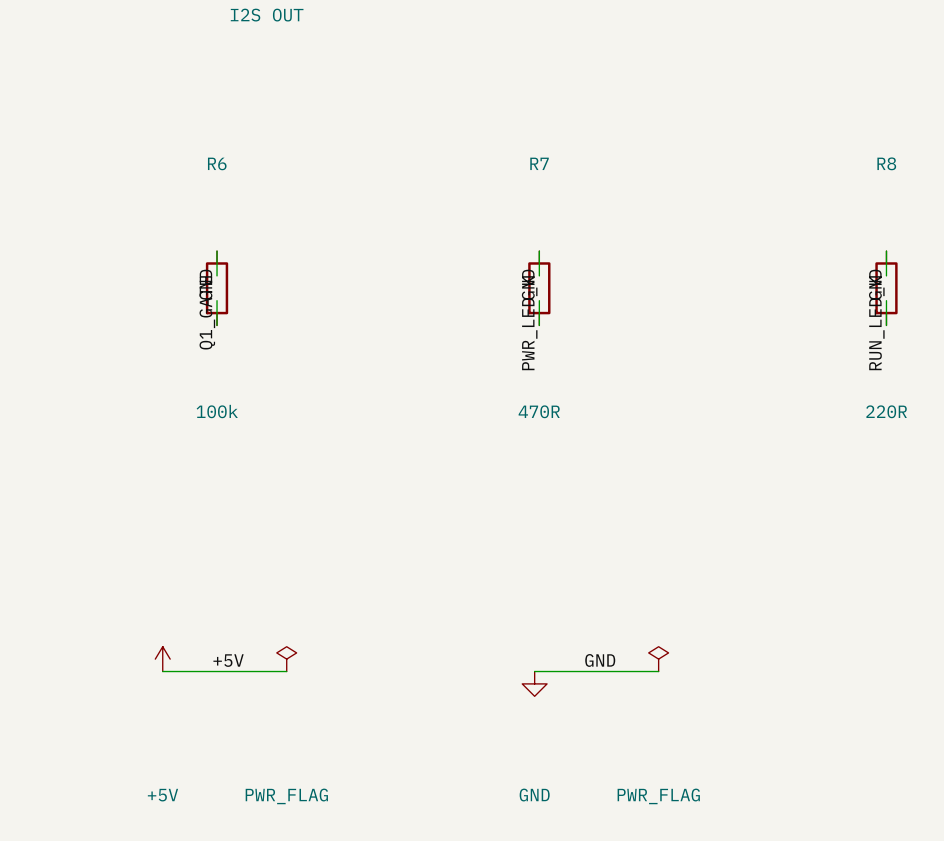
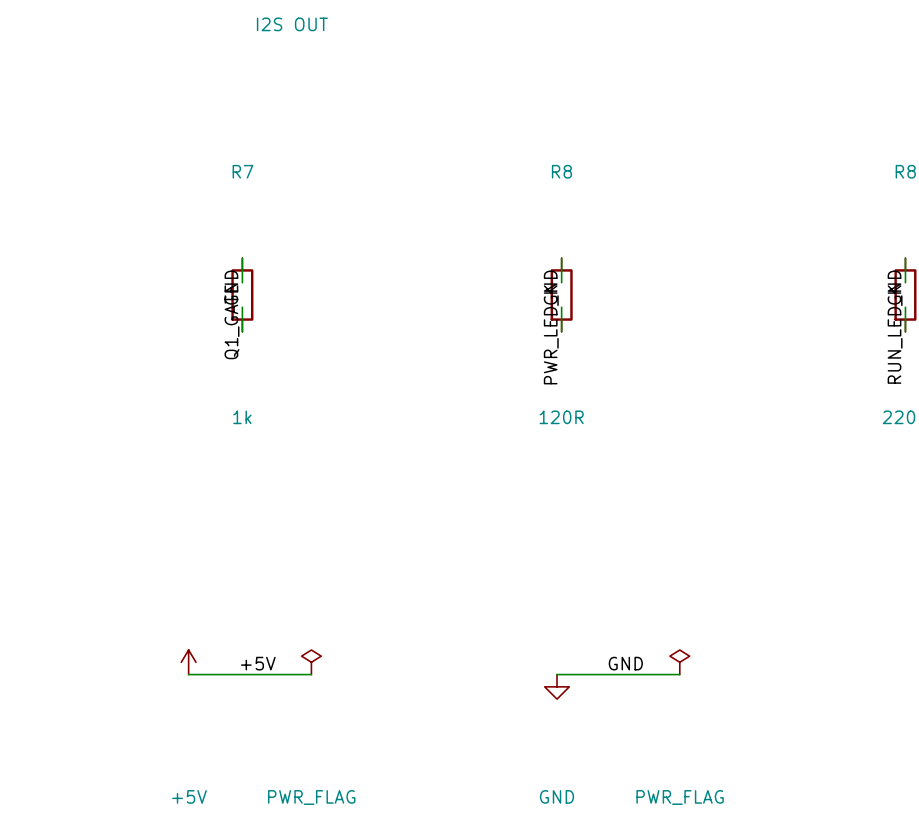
R6 name: R6 (217, 163) -> R7 (242, 171)
R7 name: R7 (539, 163) -> R8 (561, 171)
R6 value: 100k (217, 411) -> 1k (242, 417)
R7 value: 470R (539, 411) -> 120R (561, 417)

